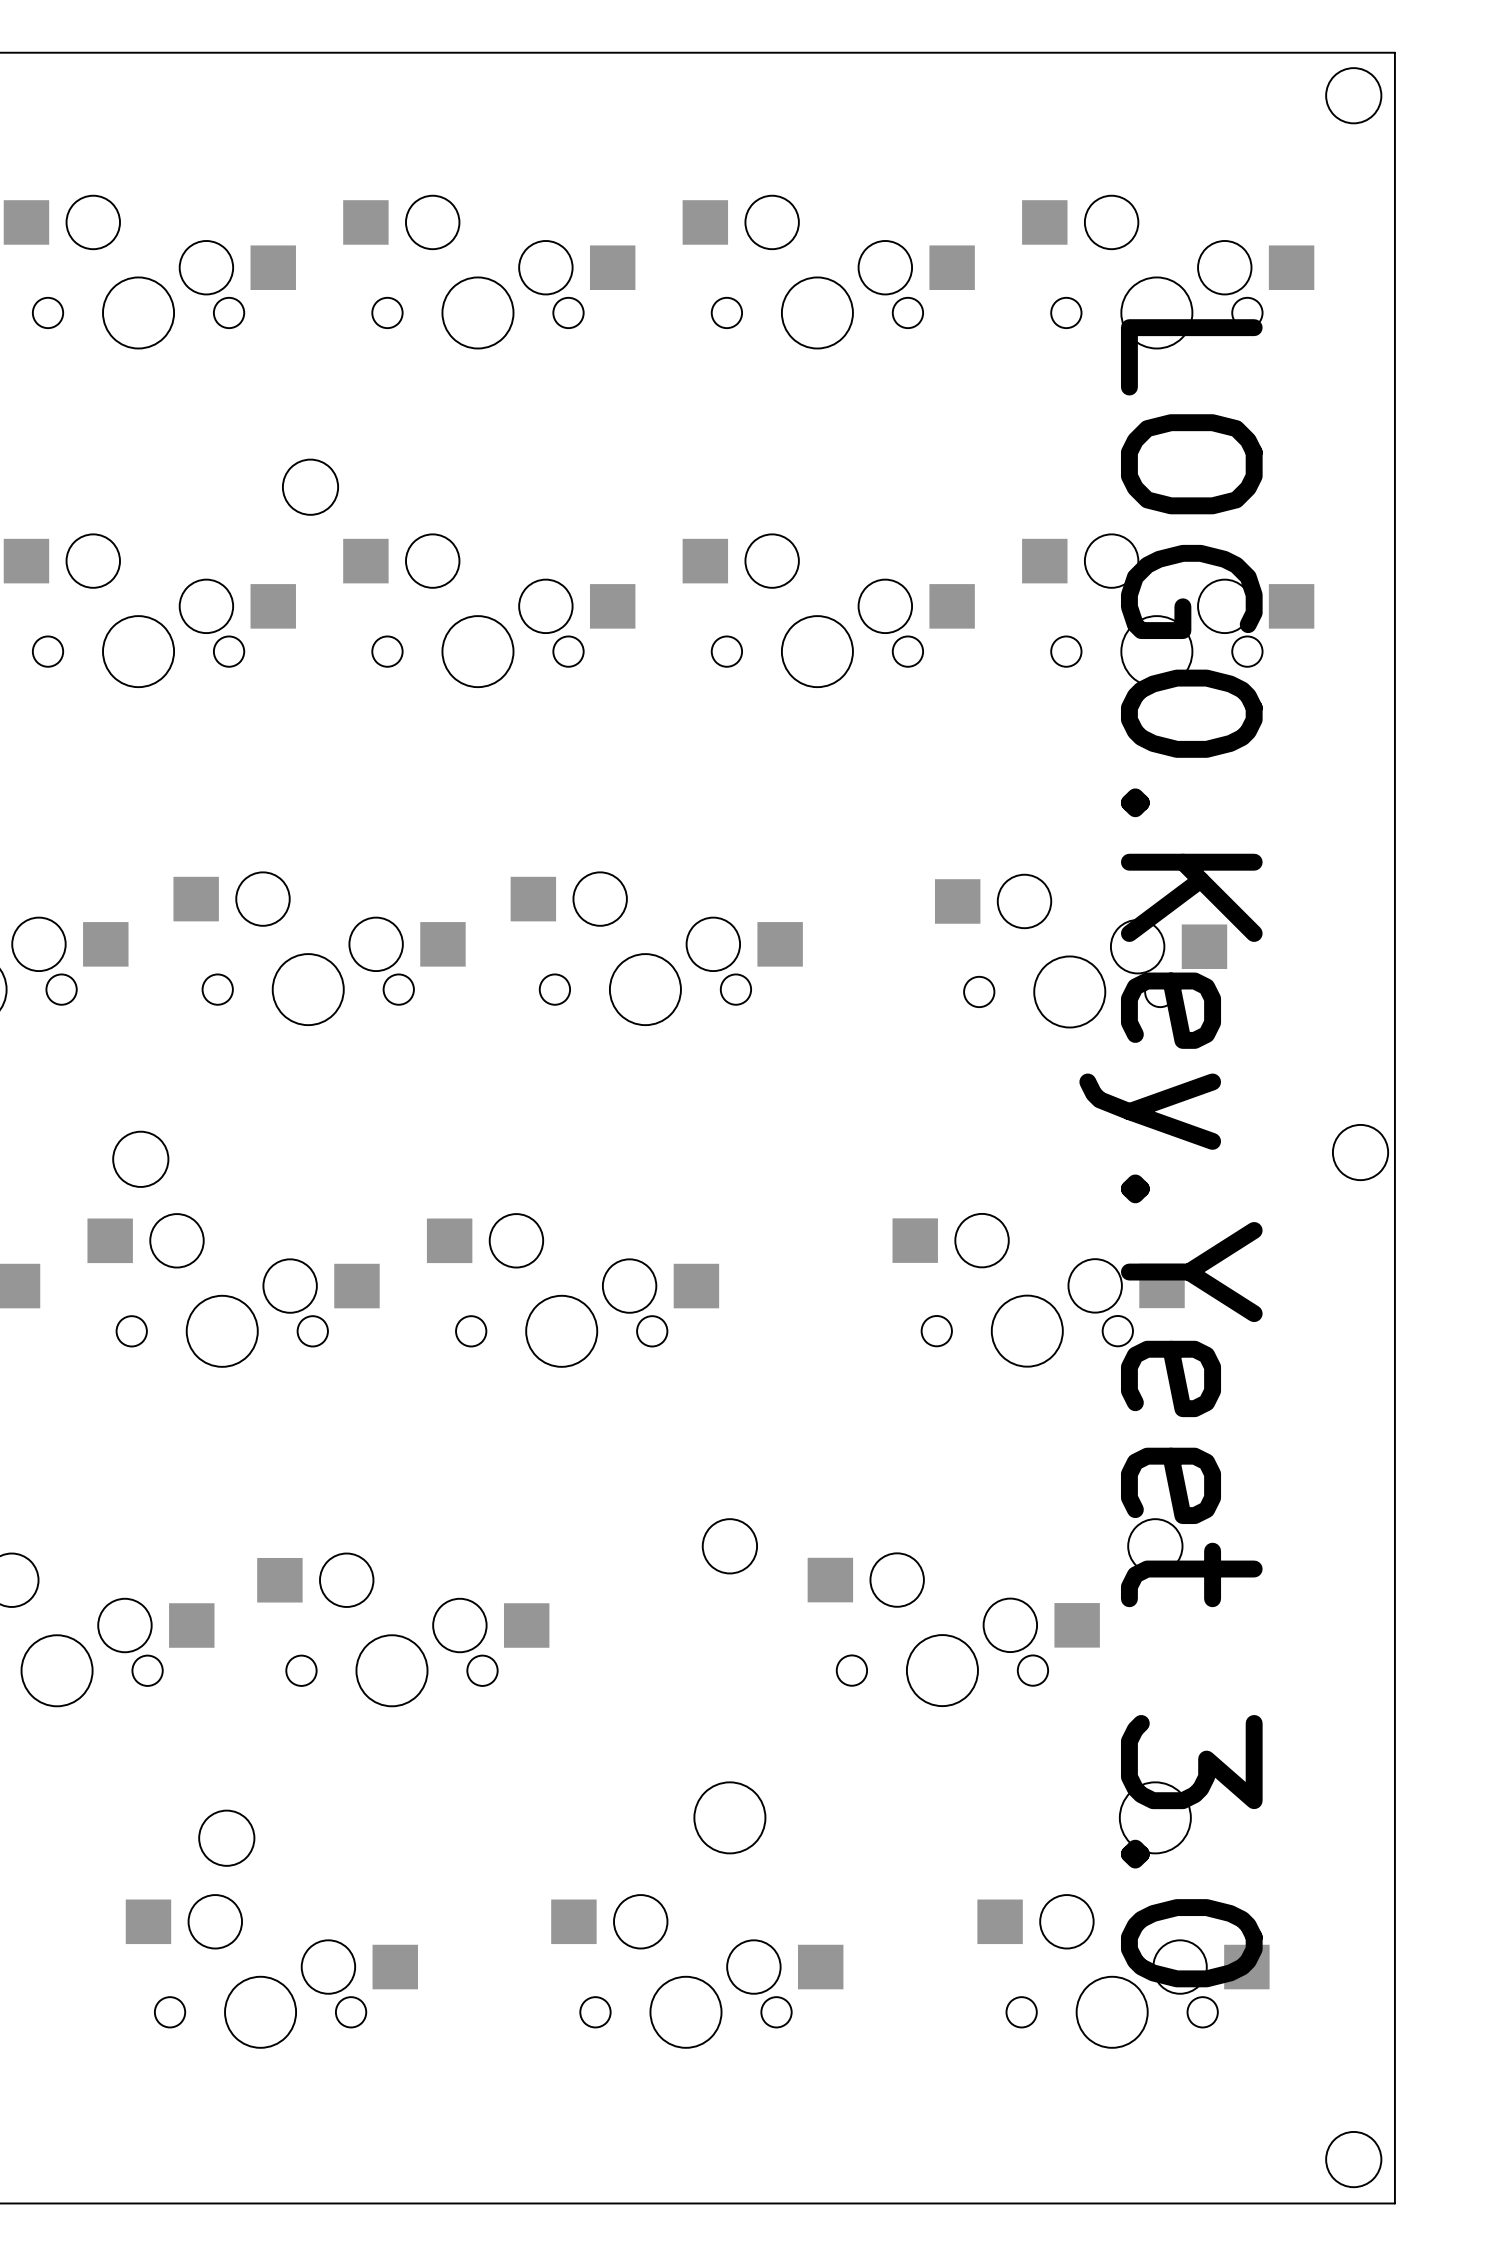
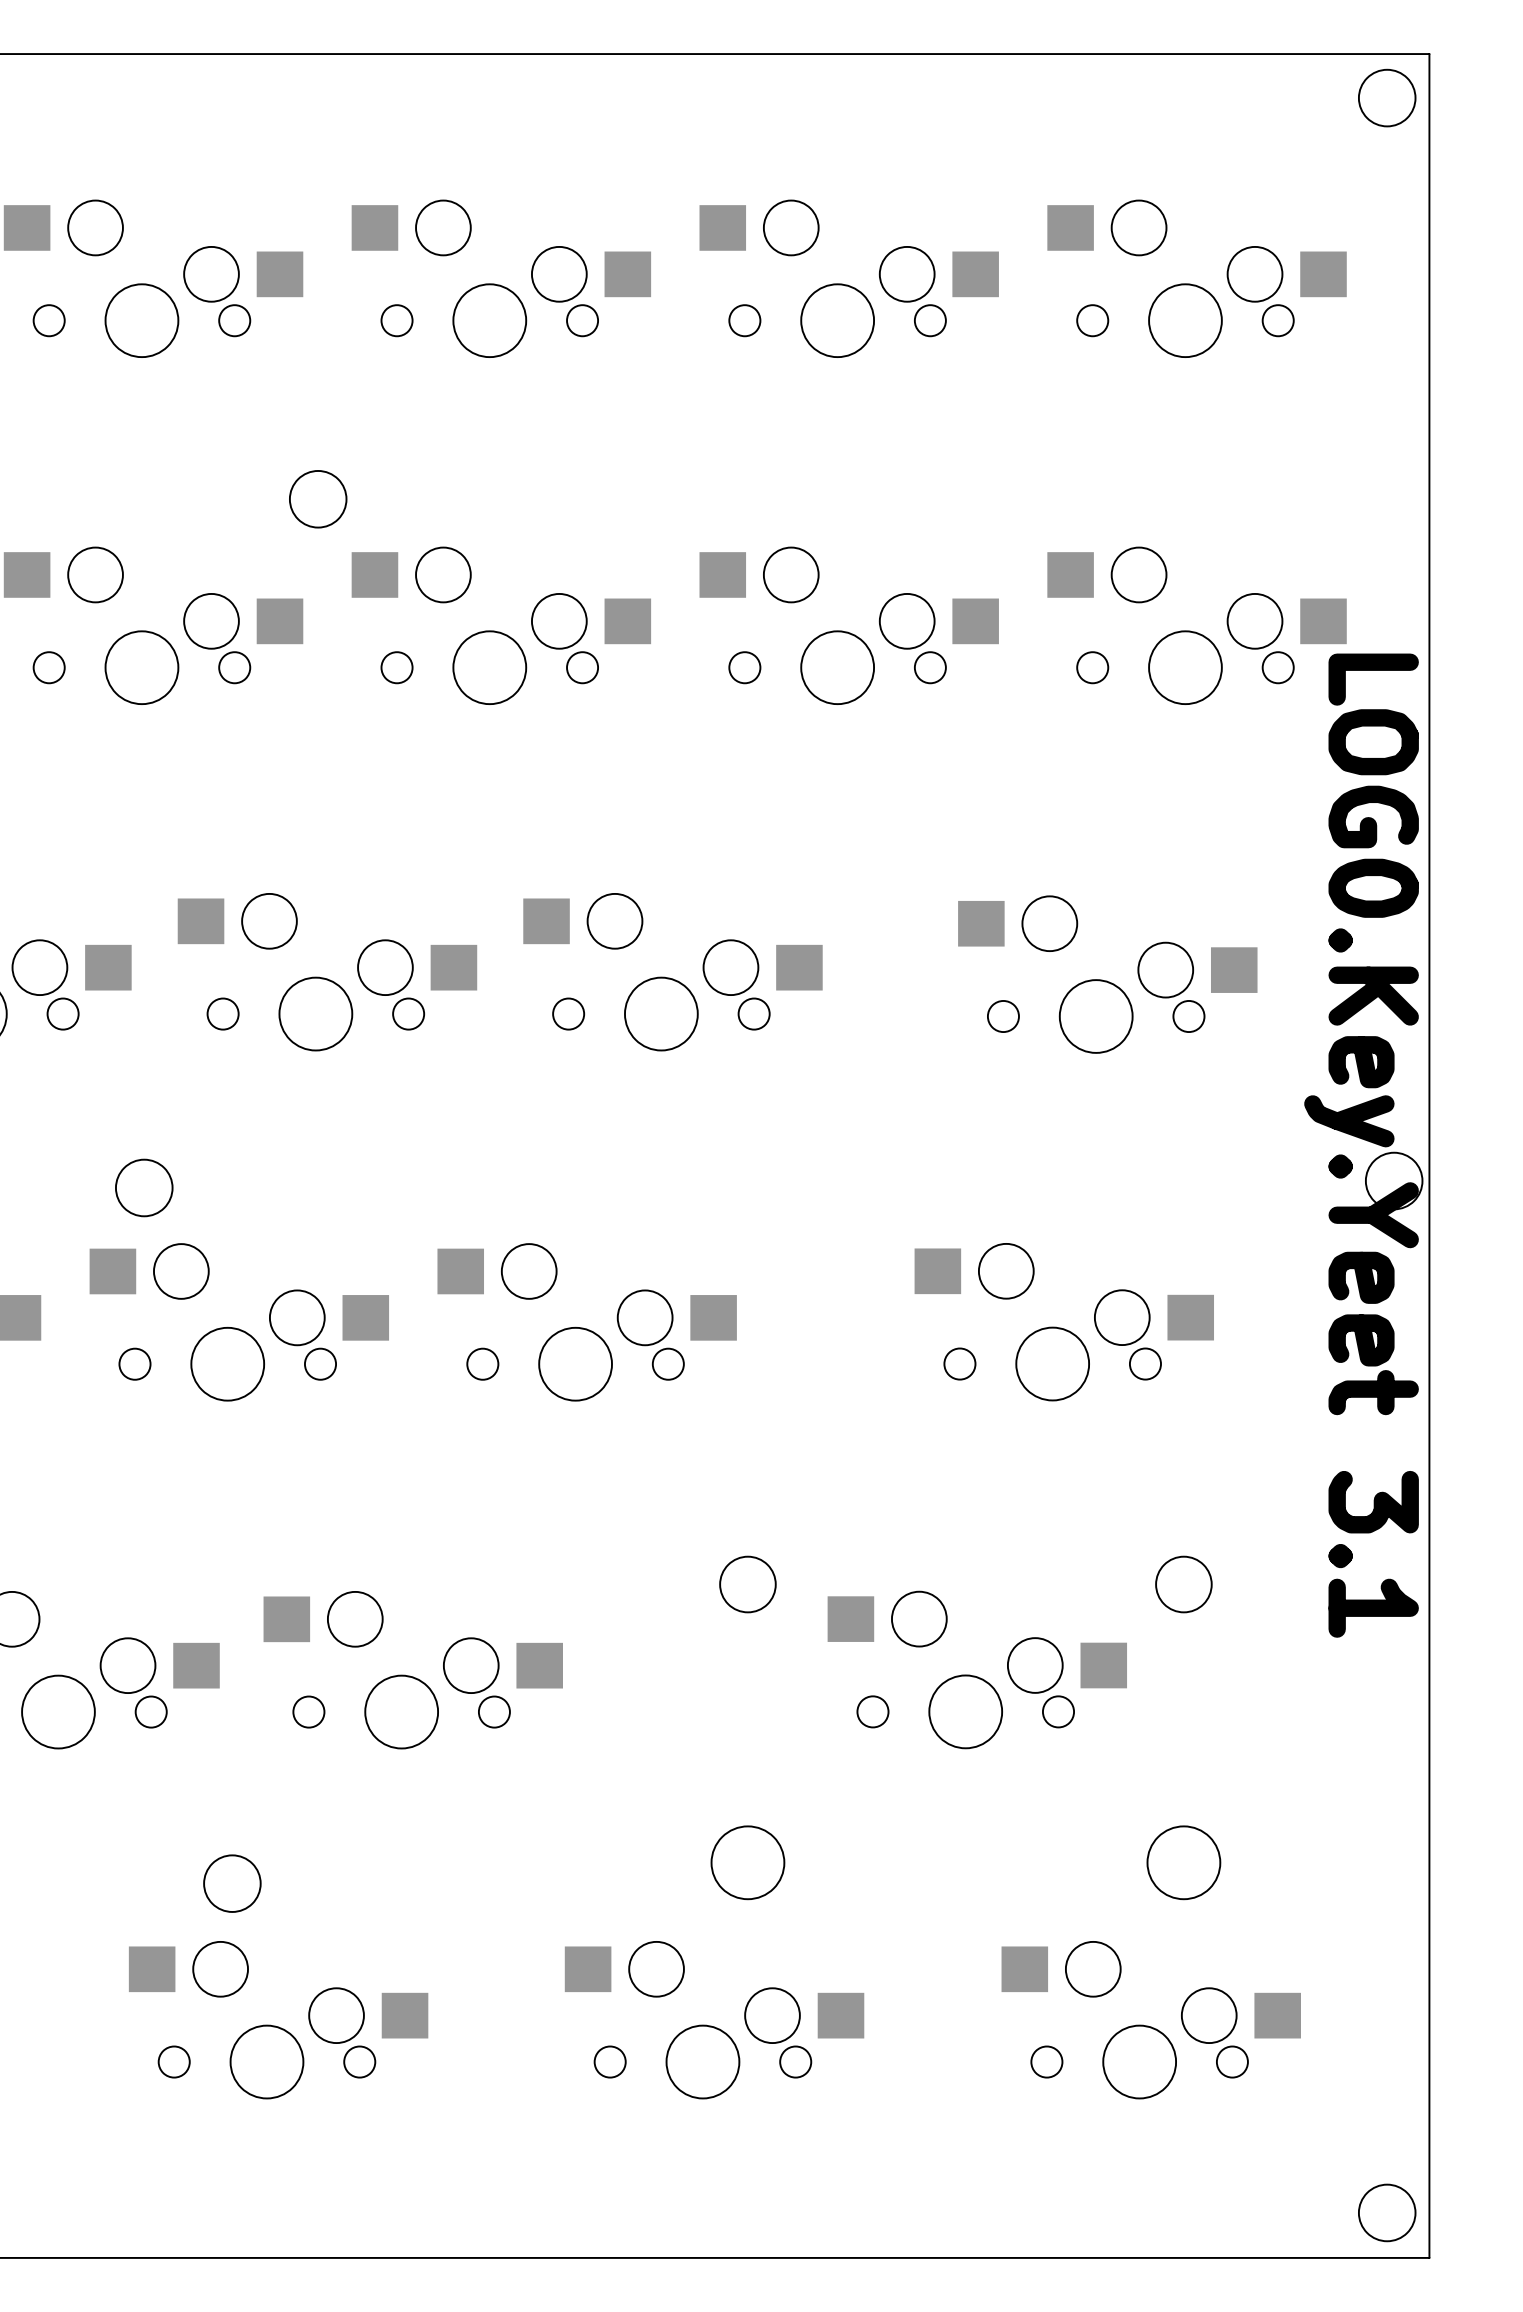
text: LOG0.Key.Yeet 3.0 (1171, 1153) -> LOG0.Key.Yeet 3.1 (1361, 1145)

